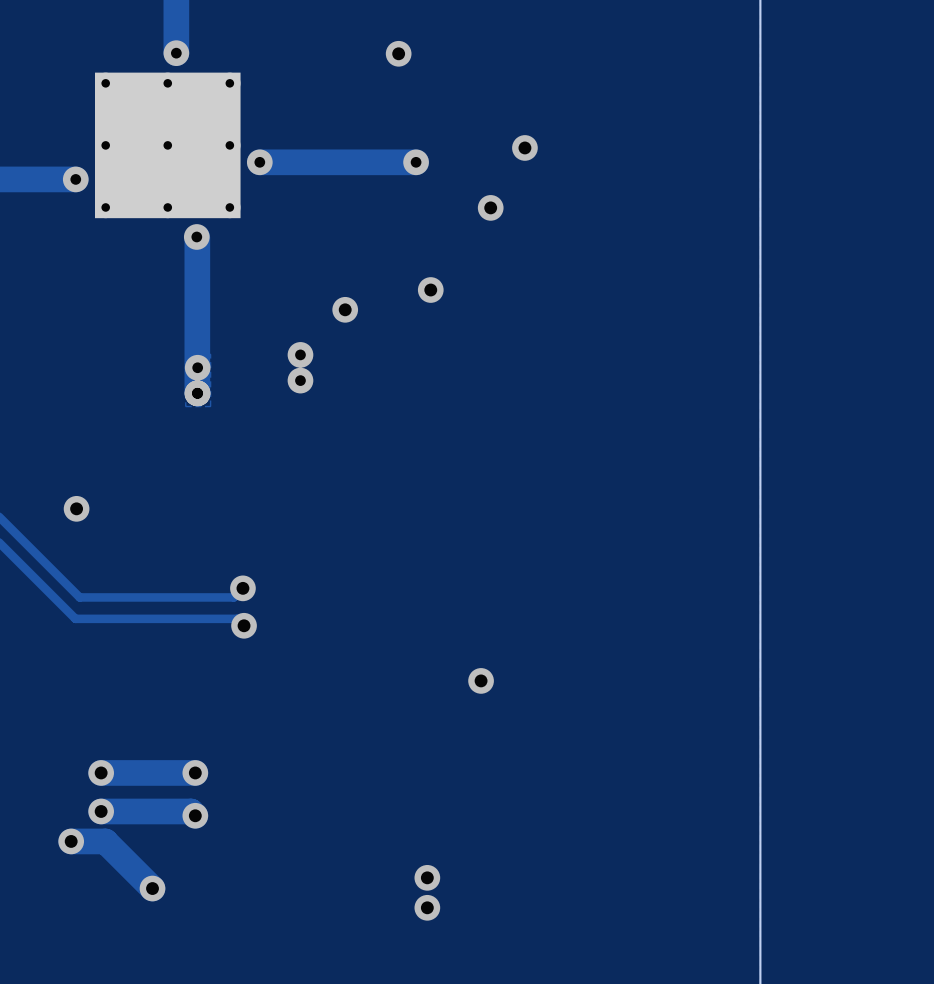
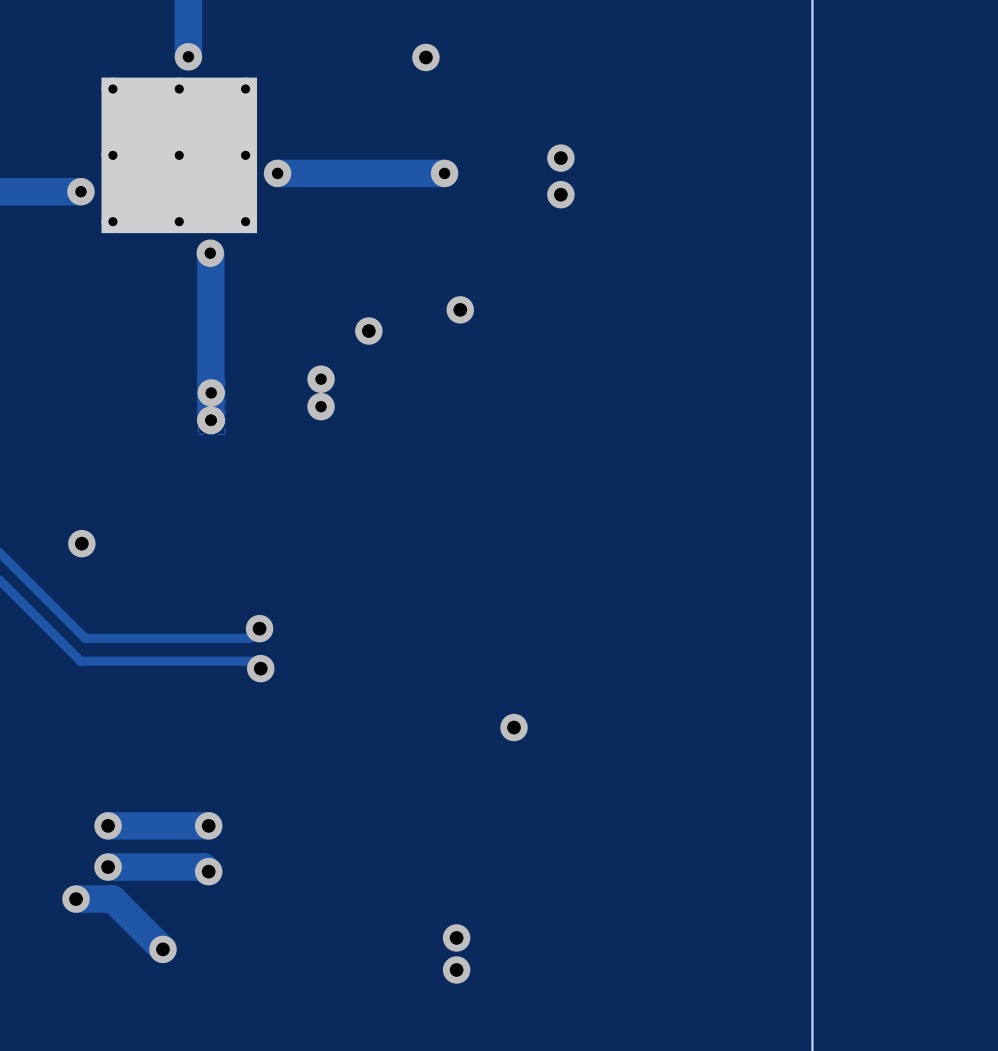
via position: (490, 207) -> (560, 194)

